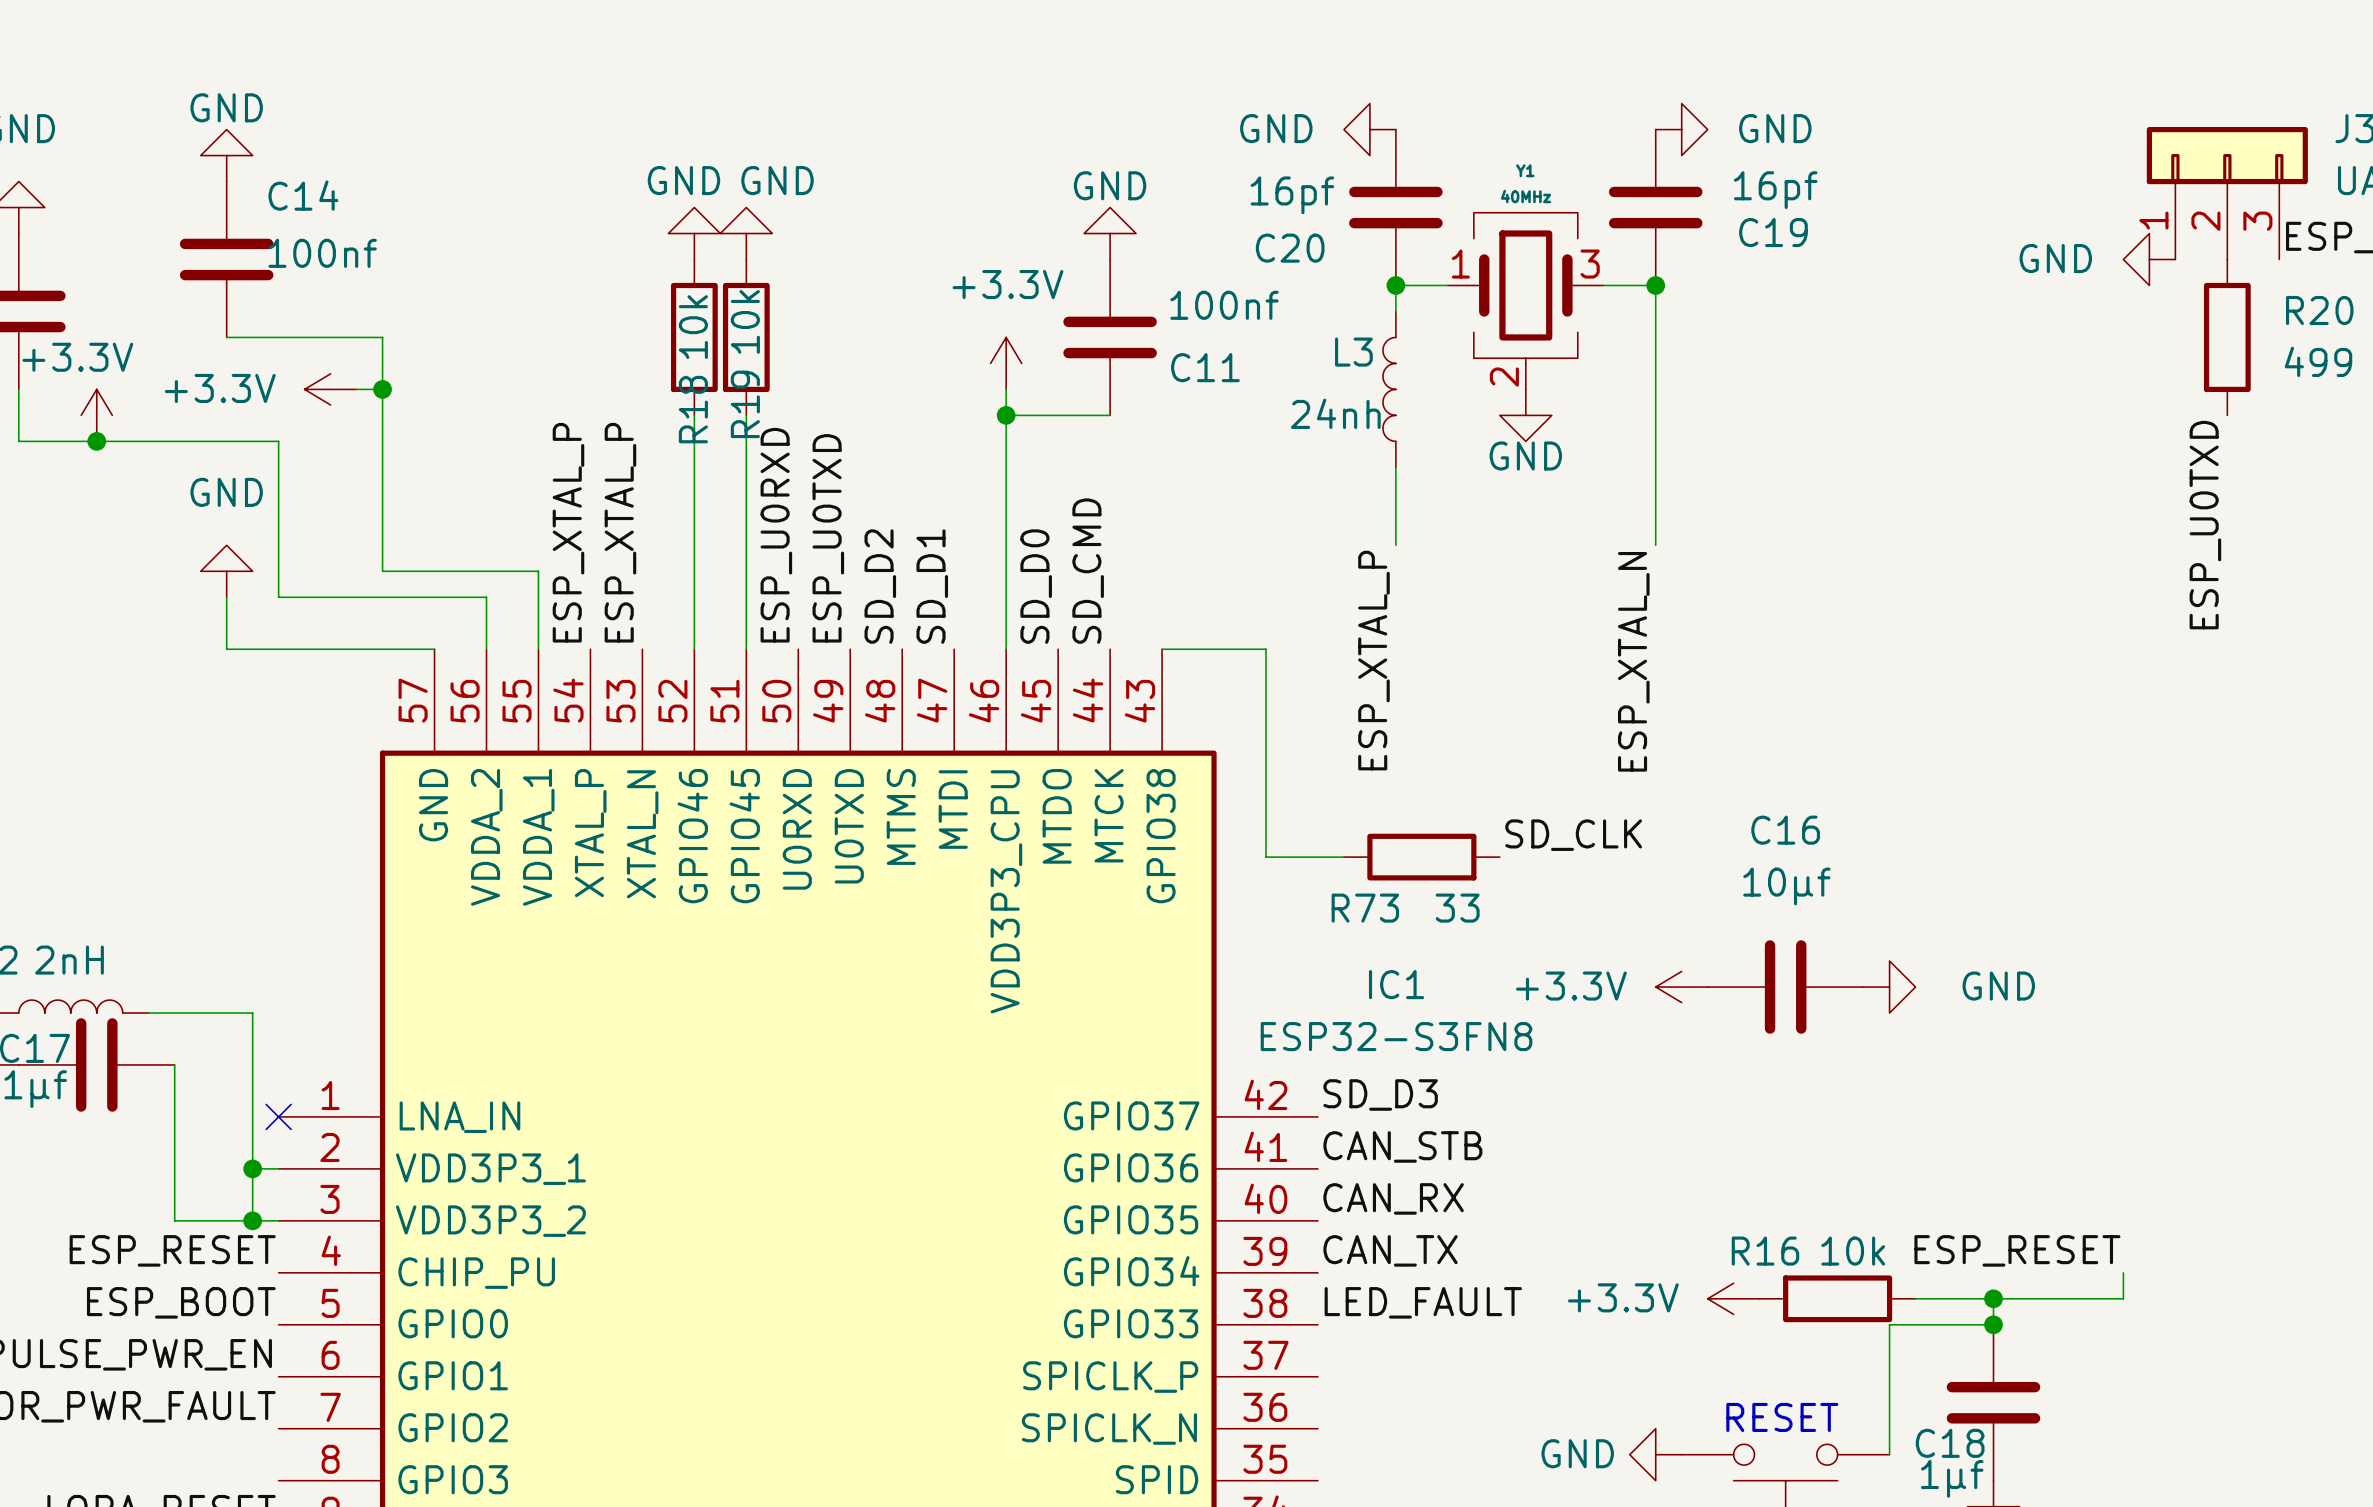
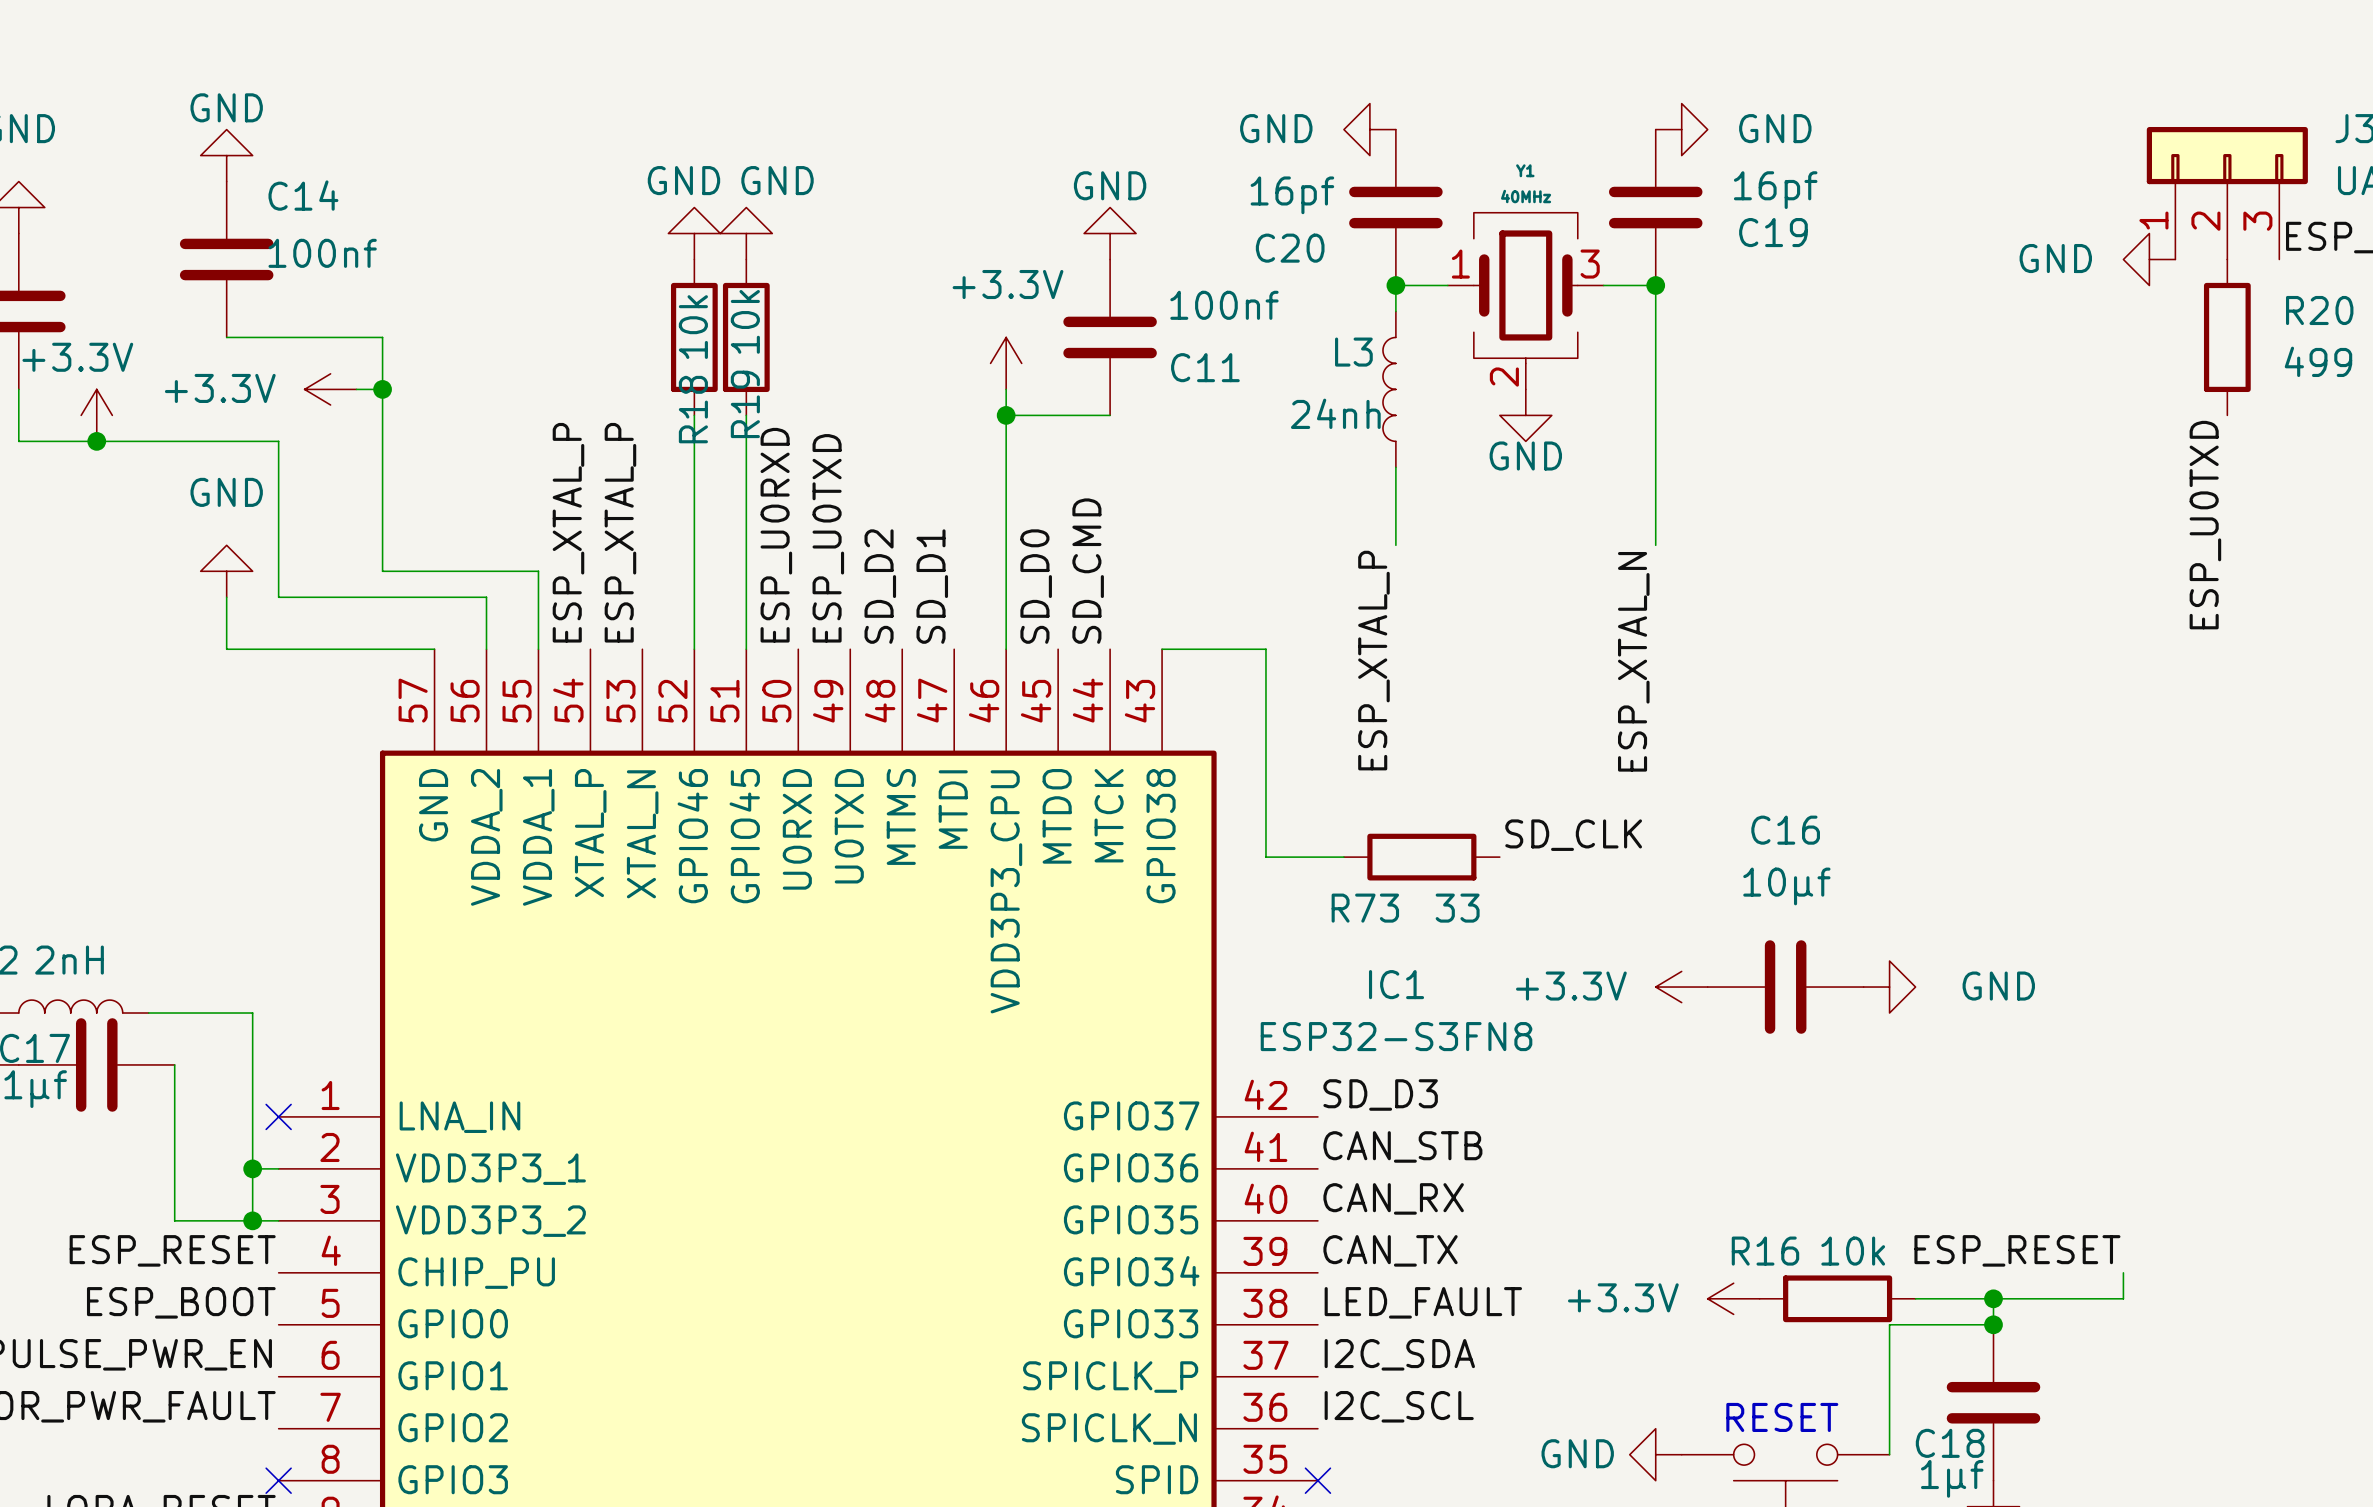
label: none -> I2C_SDA (1399, 1354)
label: none -> I2C_SCL (1399, 1406)
no-connect mark: none -> (278, 1480)
no-connect mark: none -> (1317, 1480)

